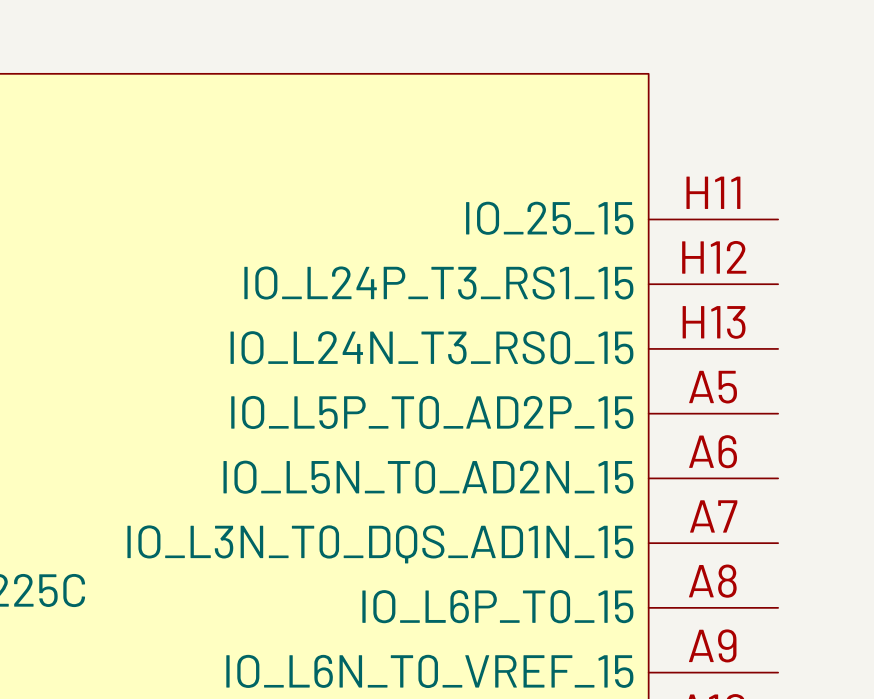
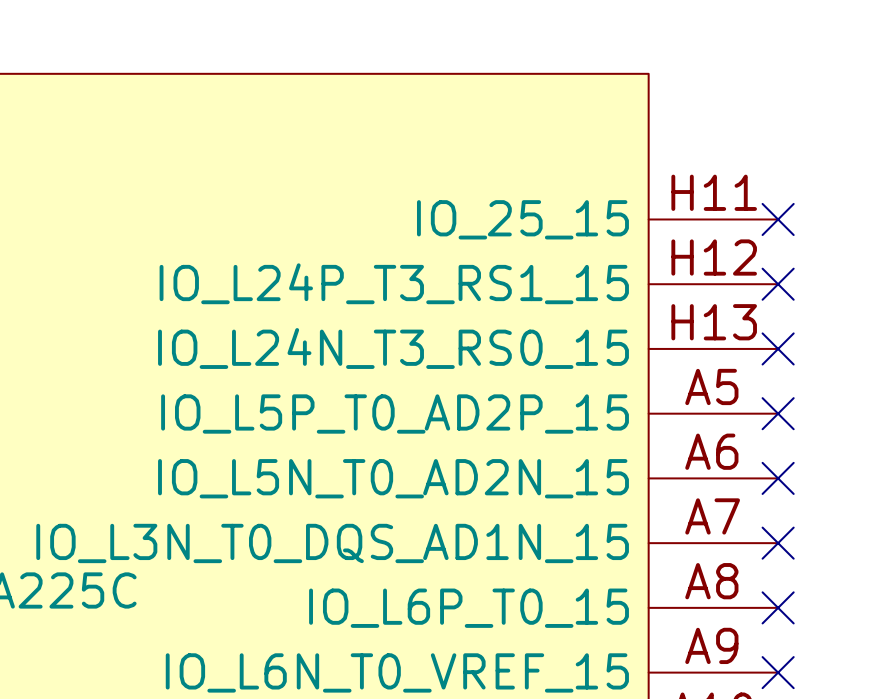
no-connect mark: none -> (778, 219)
no-connect mark: none -> (778, 284)
no-connect mark: none -> (778, 348)
no-connect mark: none -> (778, 413)
no-connect mark: none -> (778, 478)
no-connect mark: none -> (778, 543)
no-connect mark: none -> (778, 607)
no-connect mark: none -> (778, 672)

